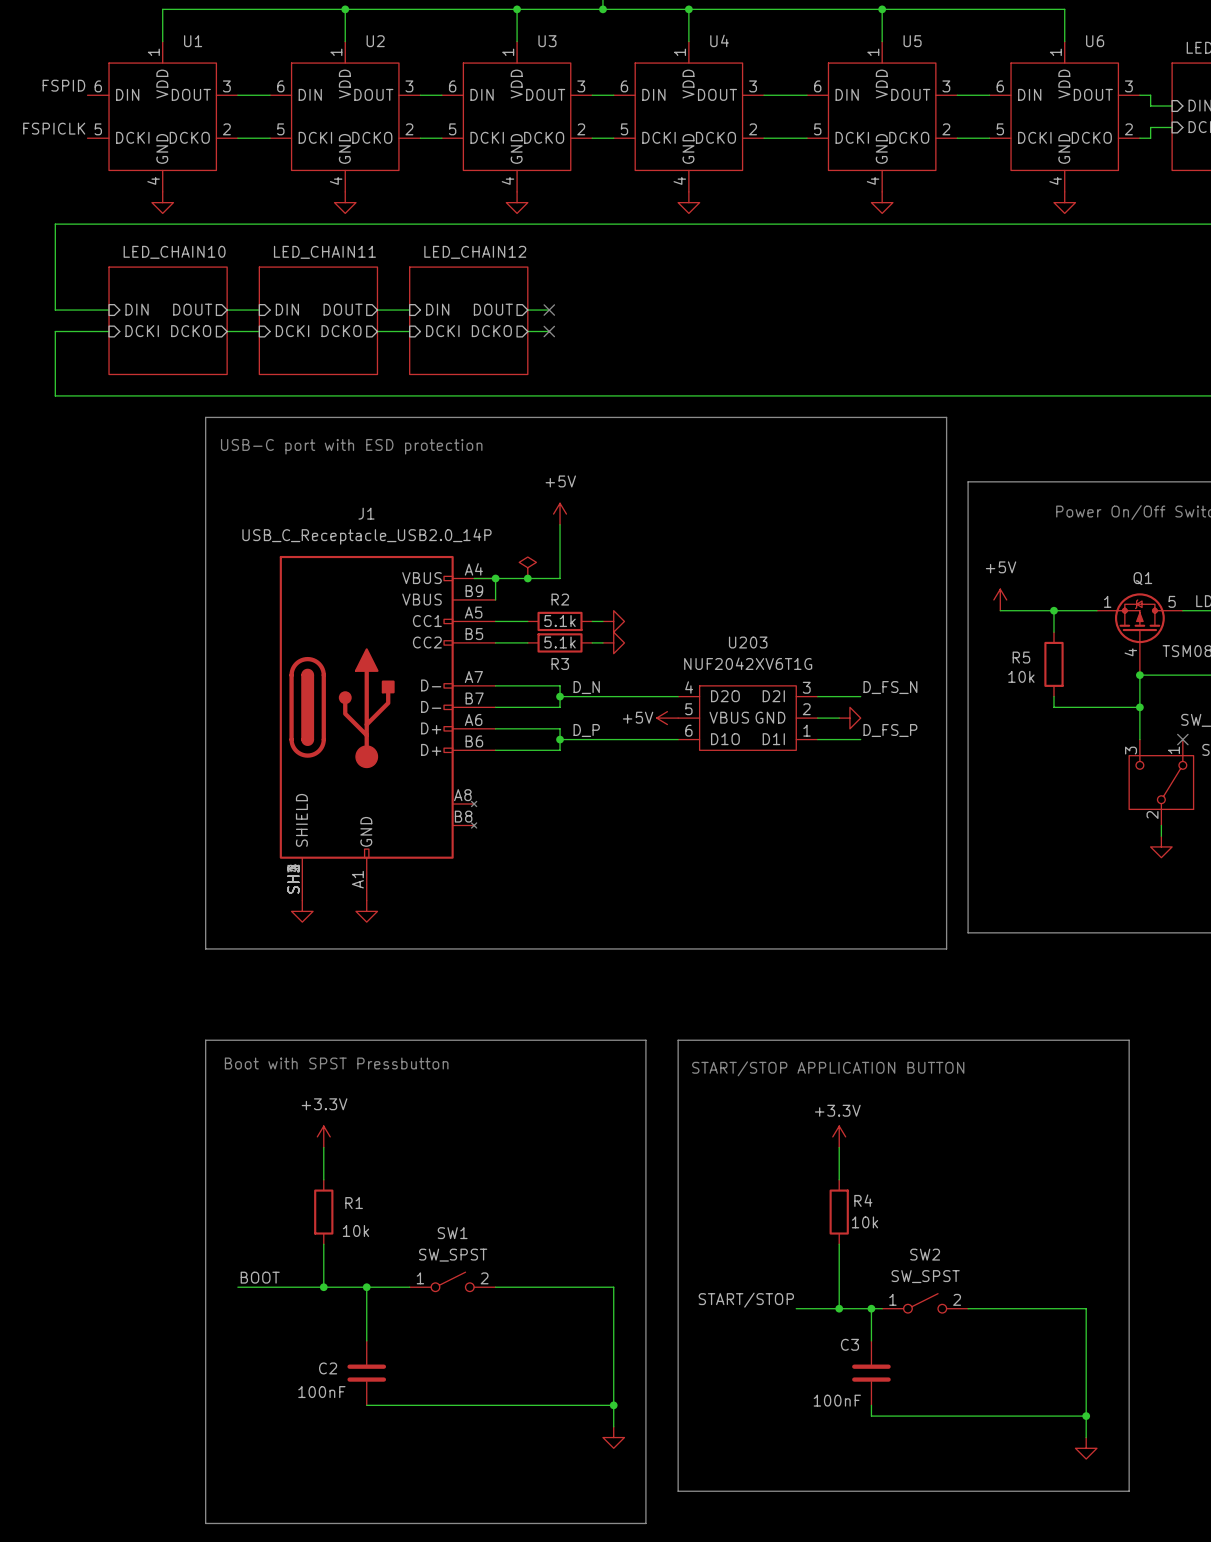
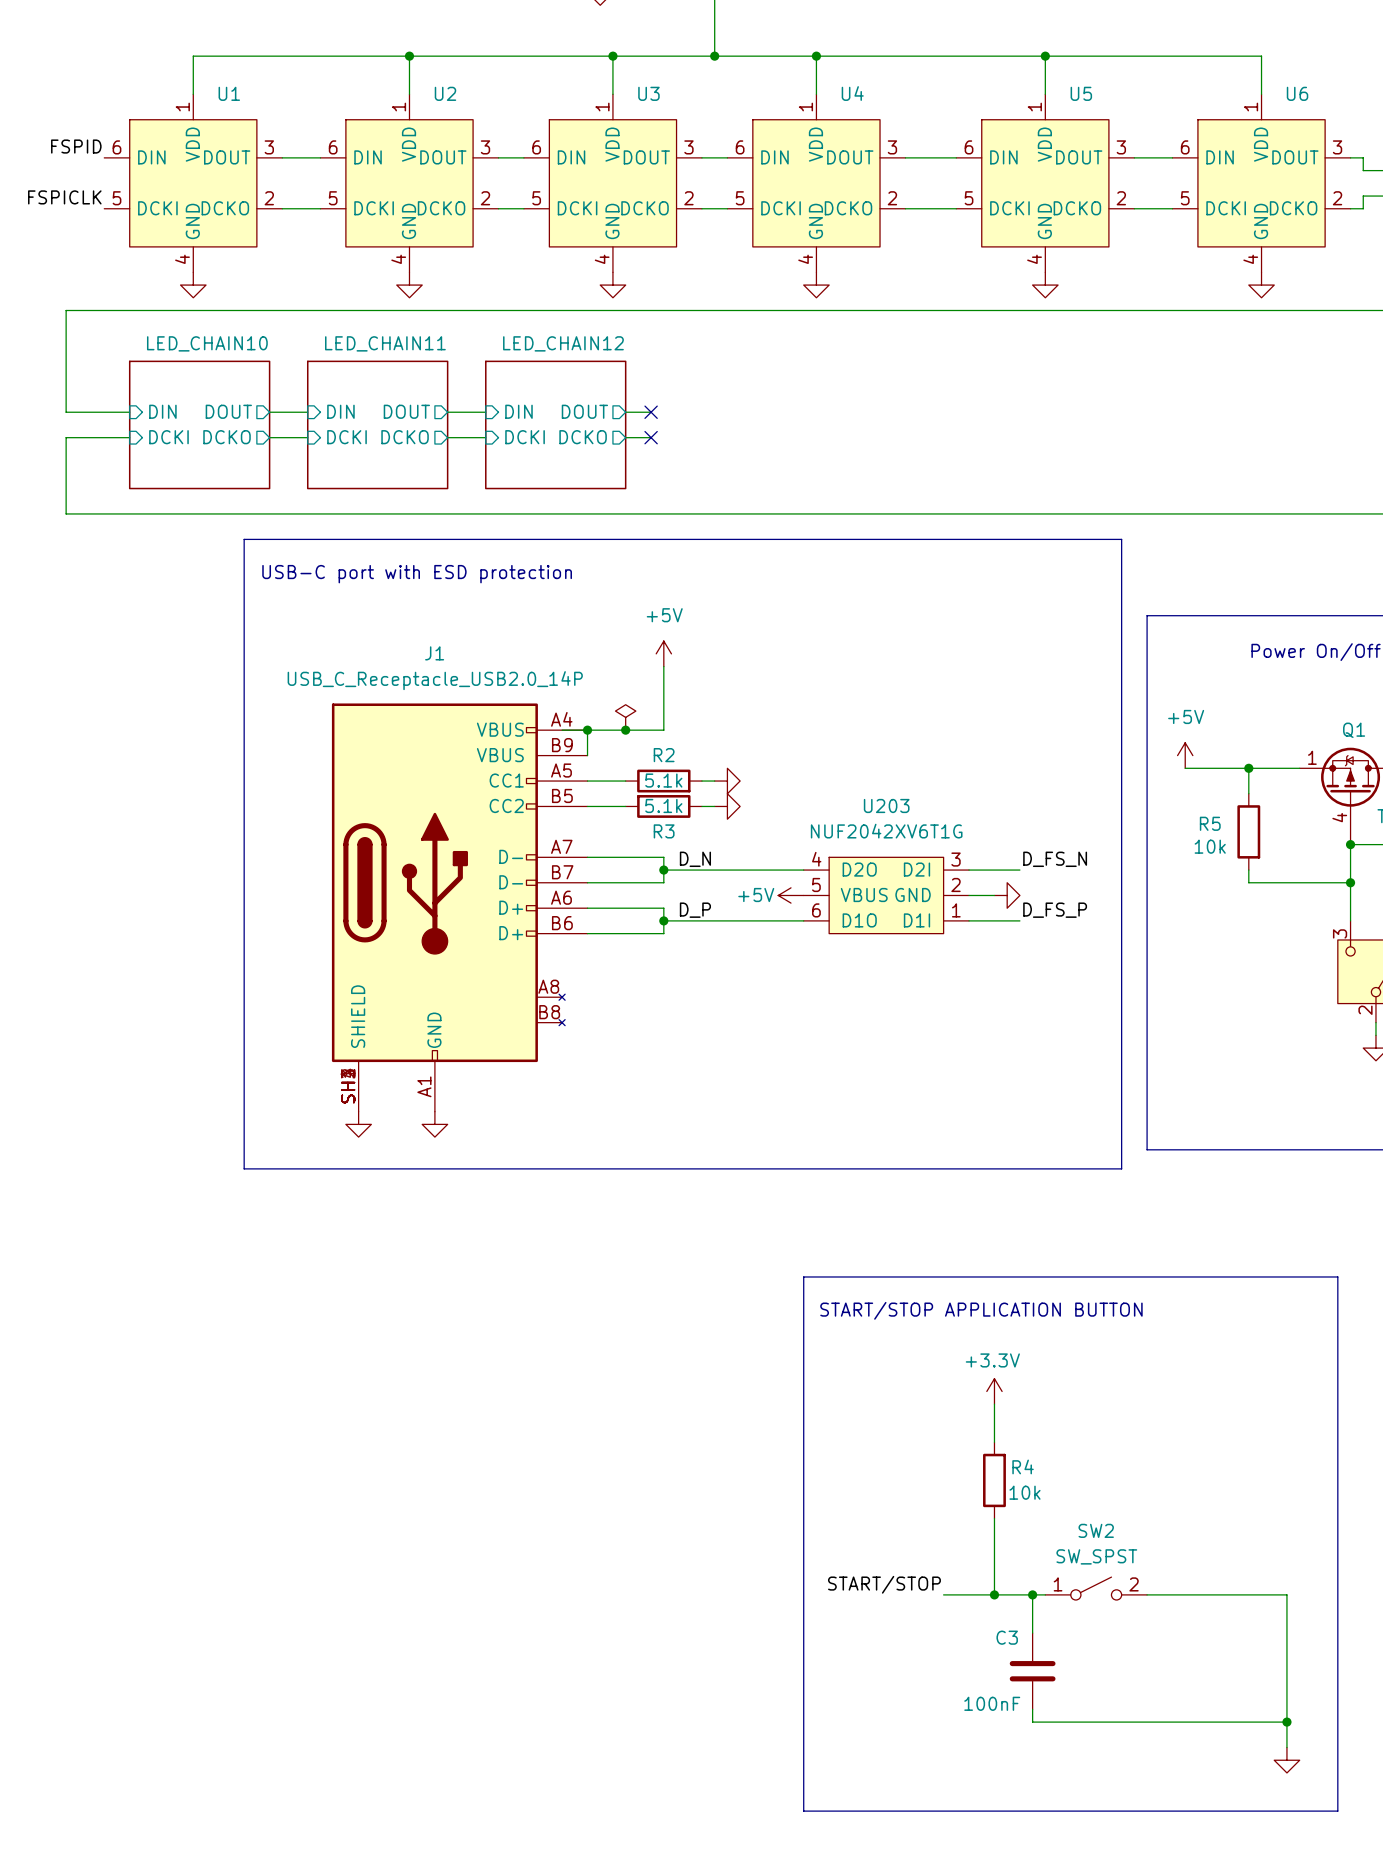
line: (205, 1040) (645, 1040) (645, 1523) (205, 1523) (205, 1040) -> none
text: Boot with SPST Pressbutton (336, 1063) -> none
power symbol: +3.3V (323, 1136) -> none
wire: (323, 1147) (323, 1179) -> none
R1: 10k (323, 1212) -> none
wire: (323, 1244) (323, 1287) -> none
label: BOOT (260, 1277) -> none
SW1: SW_SPST (452, 1281) -> none
wire: (237, 1287) (409, 1287) -> none
junction: (323, 1287) -> none
wire: (366, 1287) (366, 1340) -> none
junction: (366, 1287) -> none
wire: (495, 1287) (613, 1287) (613, 1426) -> none
C2: 100nF (366, 1373) -> none
wire: (366, 1405) (613, 1405) -> none
junction: (613, 1405) -> none
power symbol: (613, 1437) -> none

